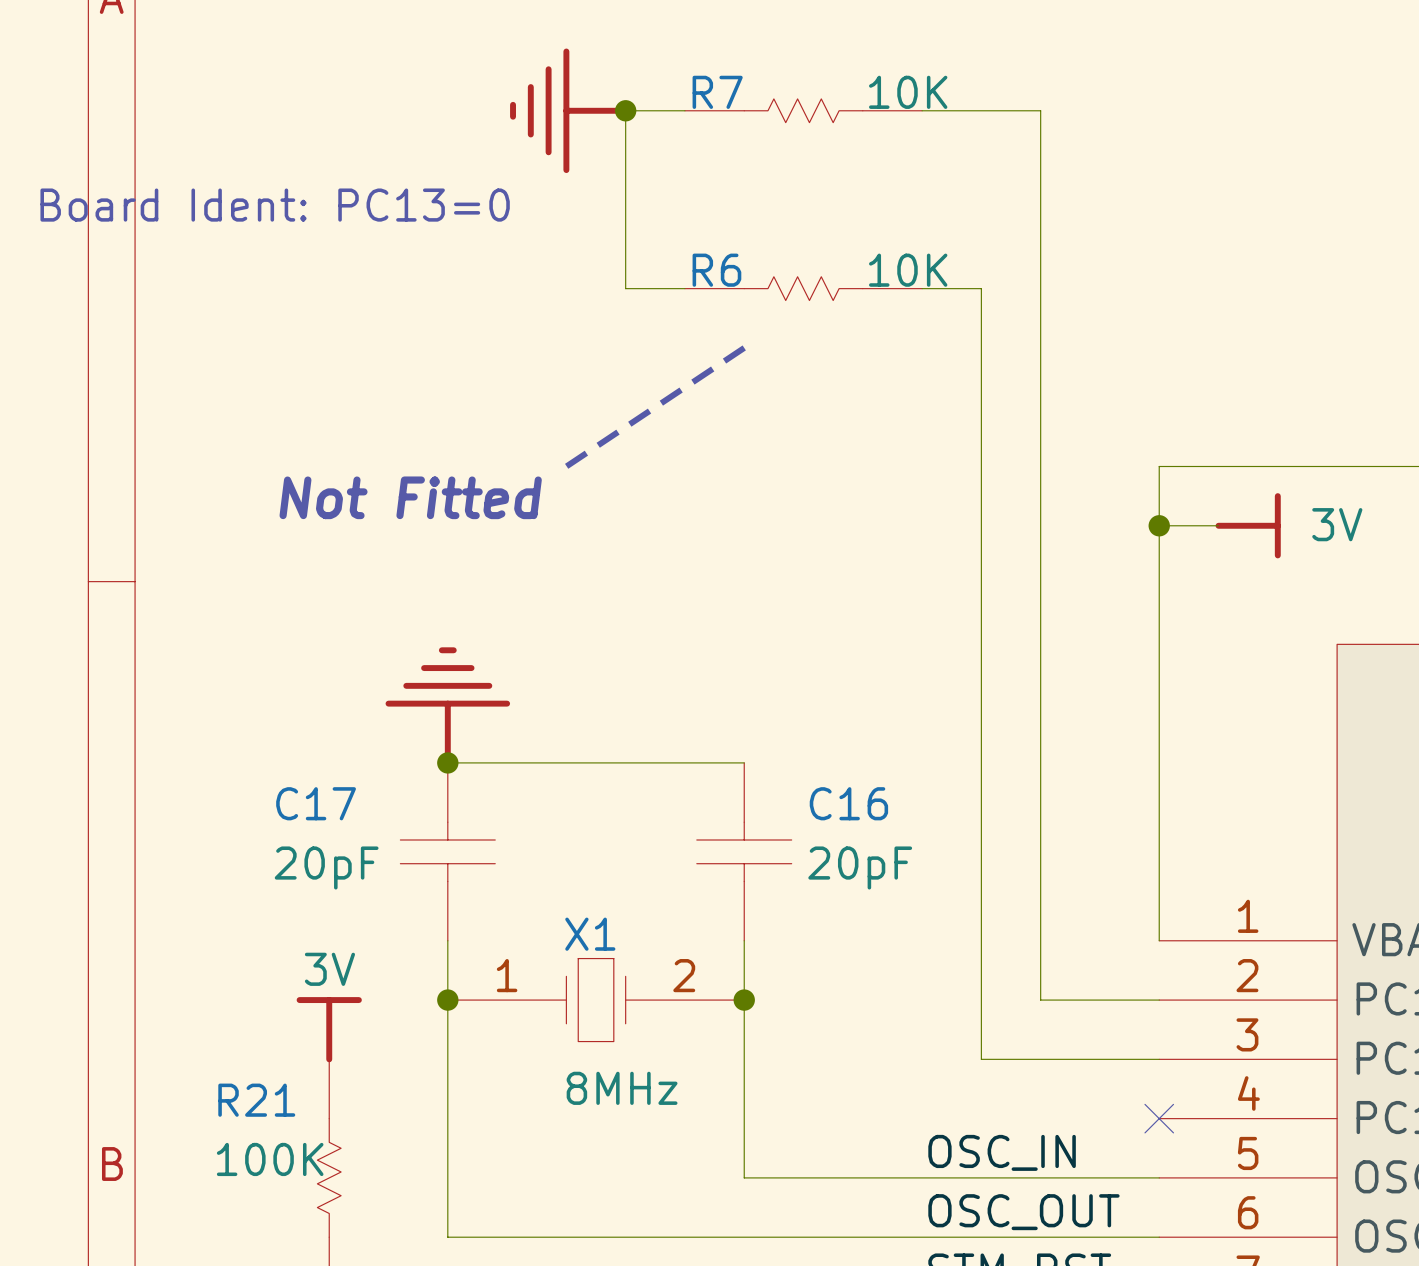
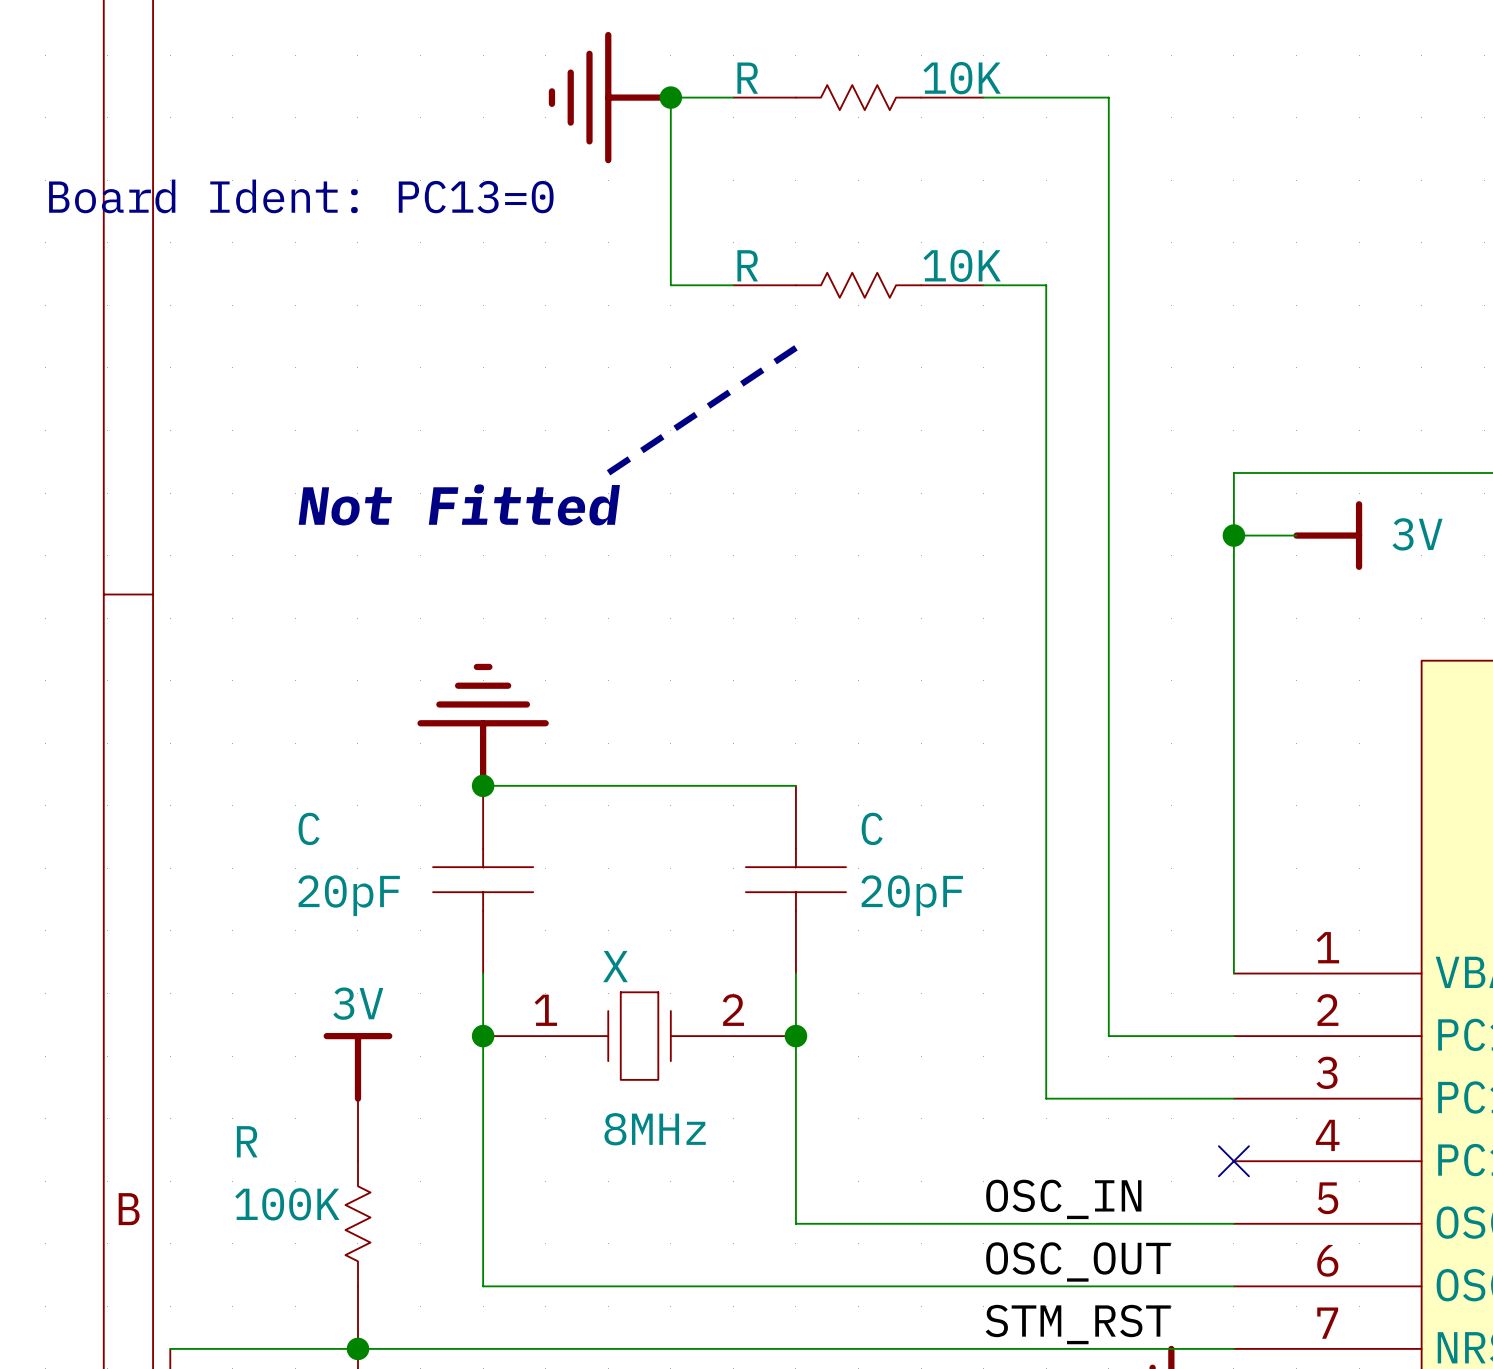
R7 name: R7 (717, 92) -> R (747, 78)
R6 name: R6 (716, 270) -> R (747, 265)
C17 name: C17 (316, 803) -> C (309, 828)
C16 name: C16 (848, 803) -> C (872, 828)
X1 name: X1 (590, 934) -> X (615, 966)
R21 name: R21 (256, 1100) -> R (247, 1141)

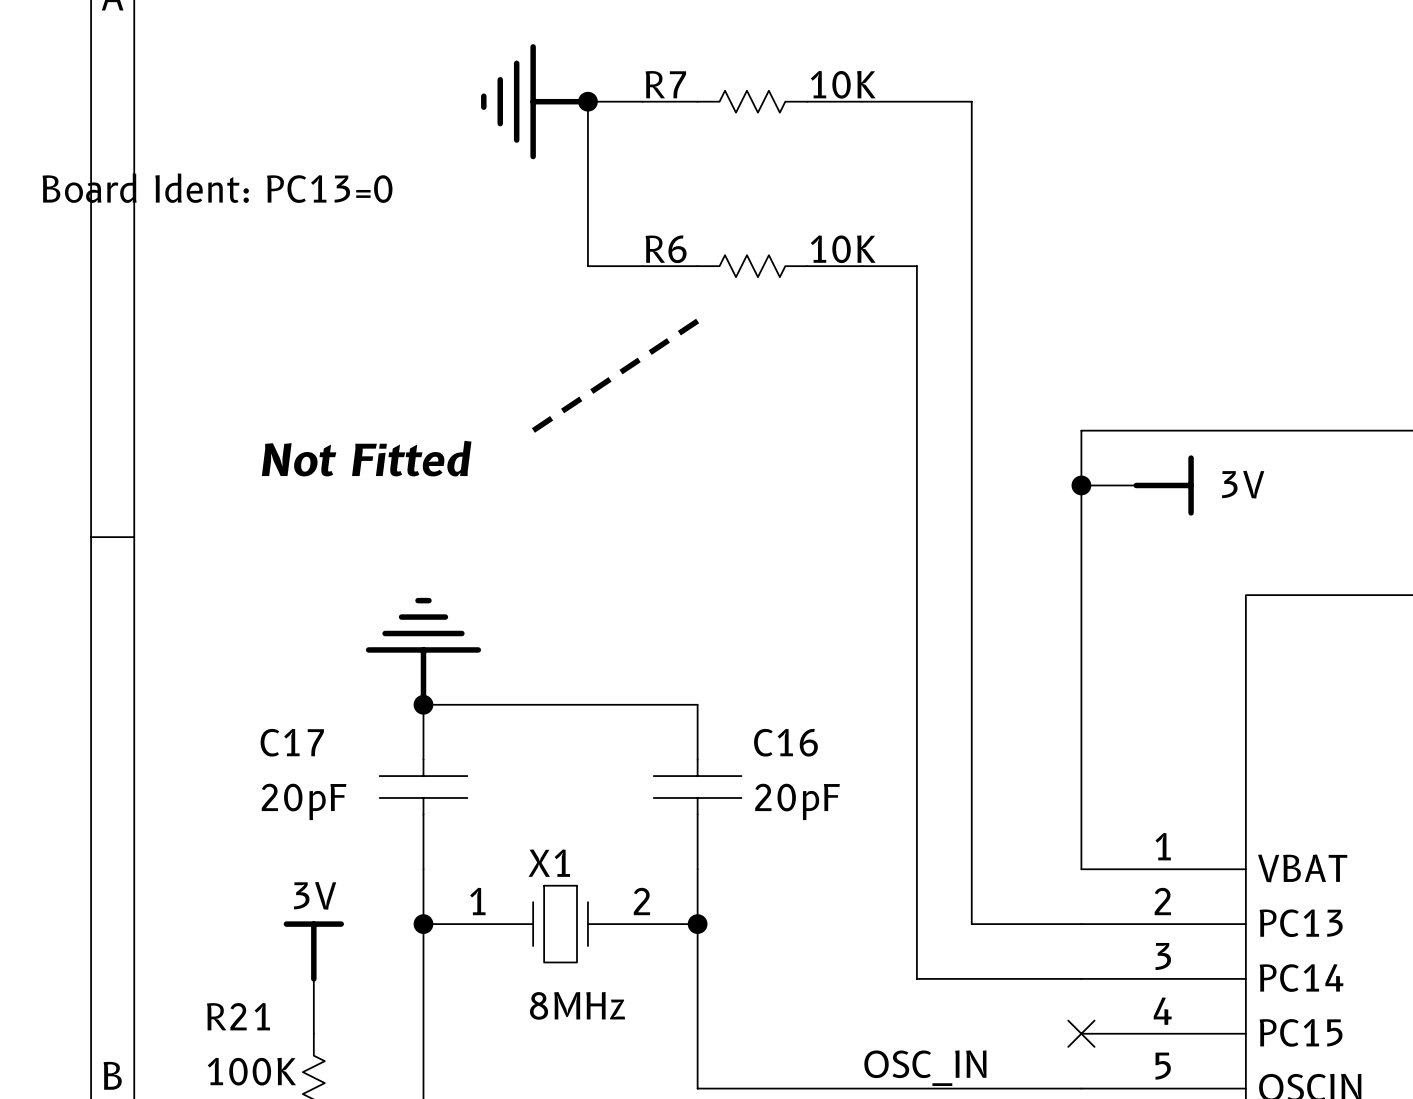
R name: R (747, 78) -> R7 (665, 84)
R name: R (747, 265) -> R6 (666, 249)
C name: C (309, 828) -> C17 (292, 742)
C name: C (872, 828) -> C16 (785, 742)
X name: X (615, 966) -> X1 (549, 863)
R name: R (247, 1141) -> R21 (238, 1016)

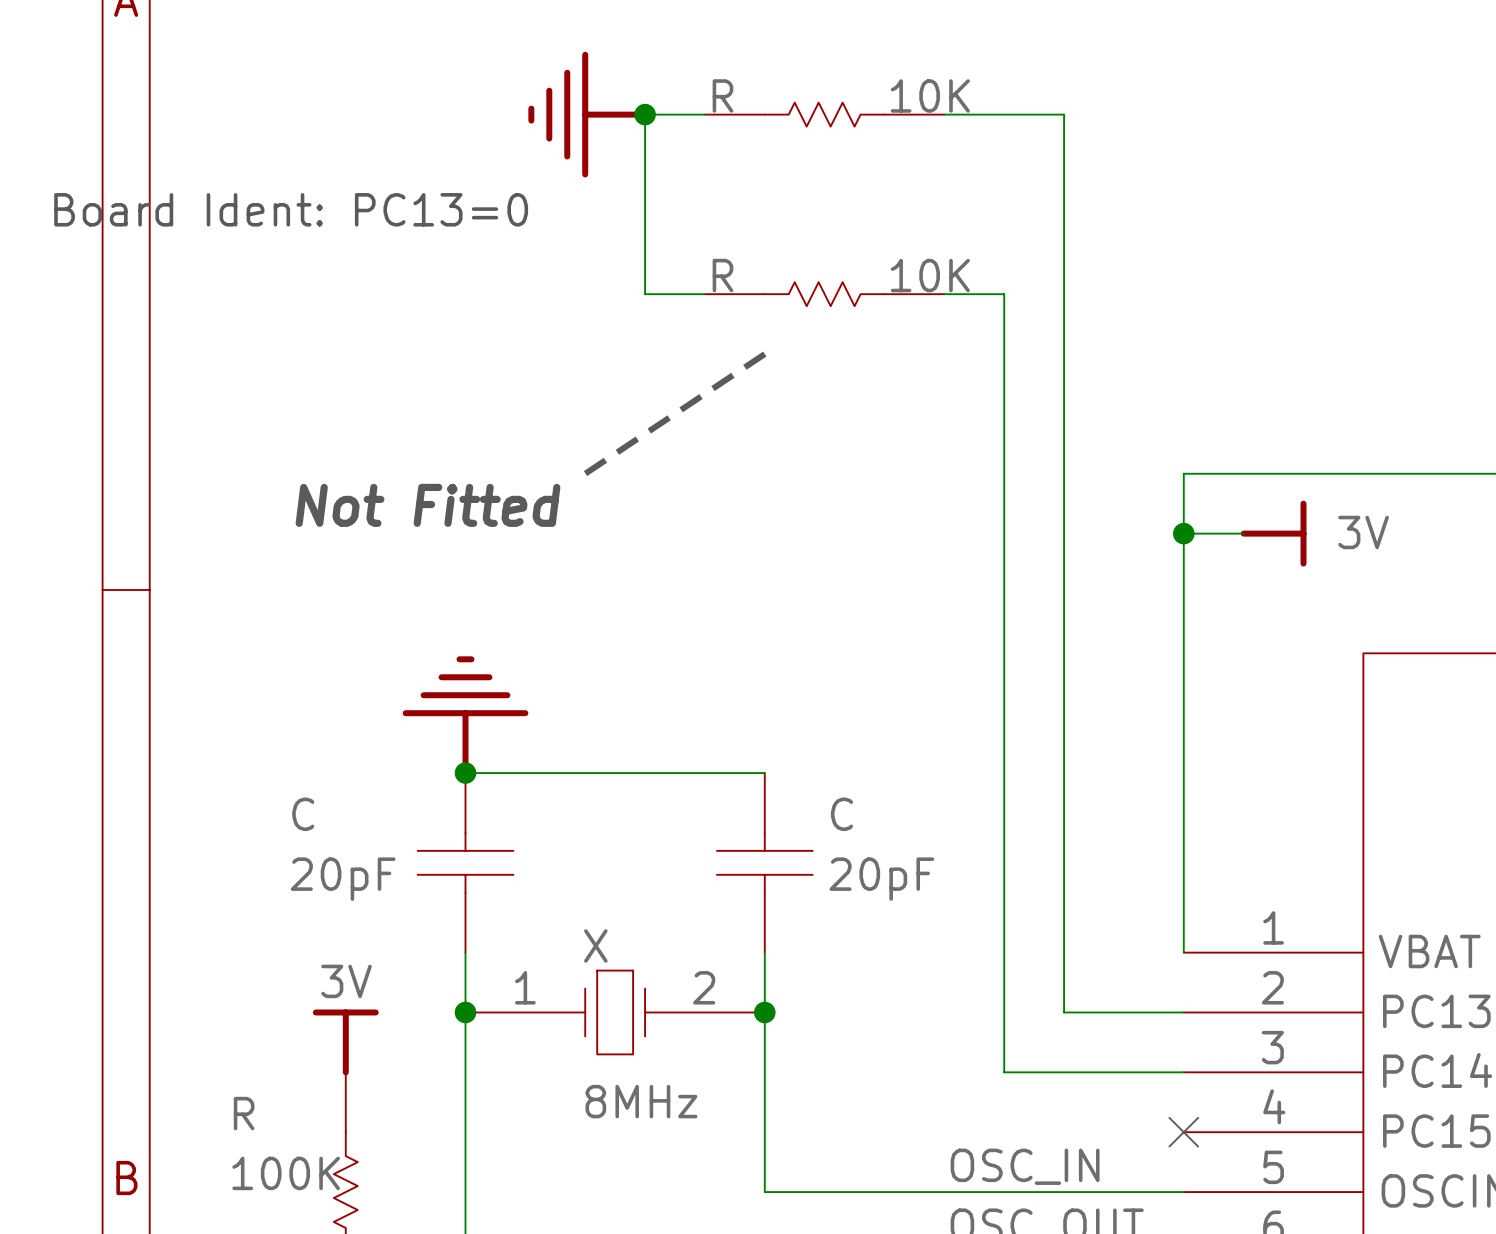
R7 name: R7 (665, 84) -> R (722, 95)
R6 name: R6 (666, 249) -> R (722, 275)
C17 name: C17 (292, 742) -> C (303, 814)
C16 name: C16 (785, 742) -> C (841, 814)
X1 name: X1 (549, 863) -> X (595, 945)
R21 name: R21 (238, 1016) -> R (244, 1113)

